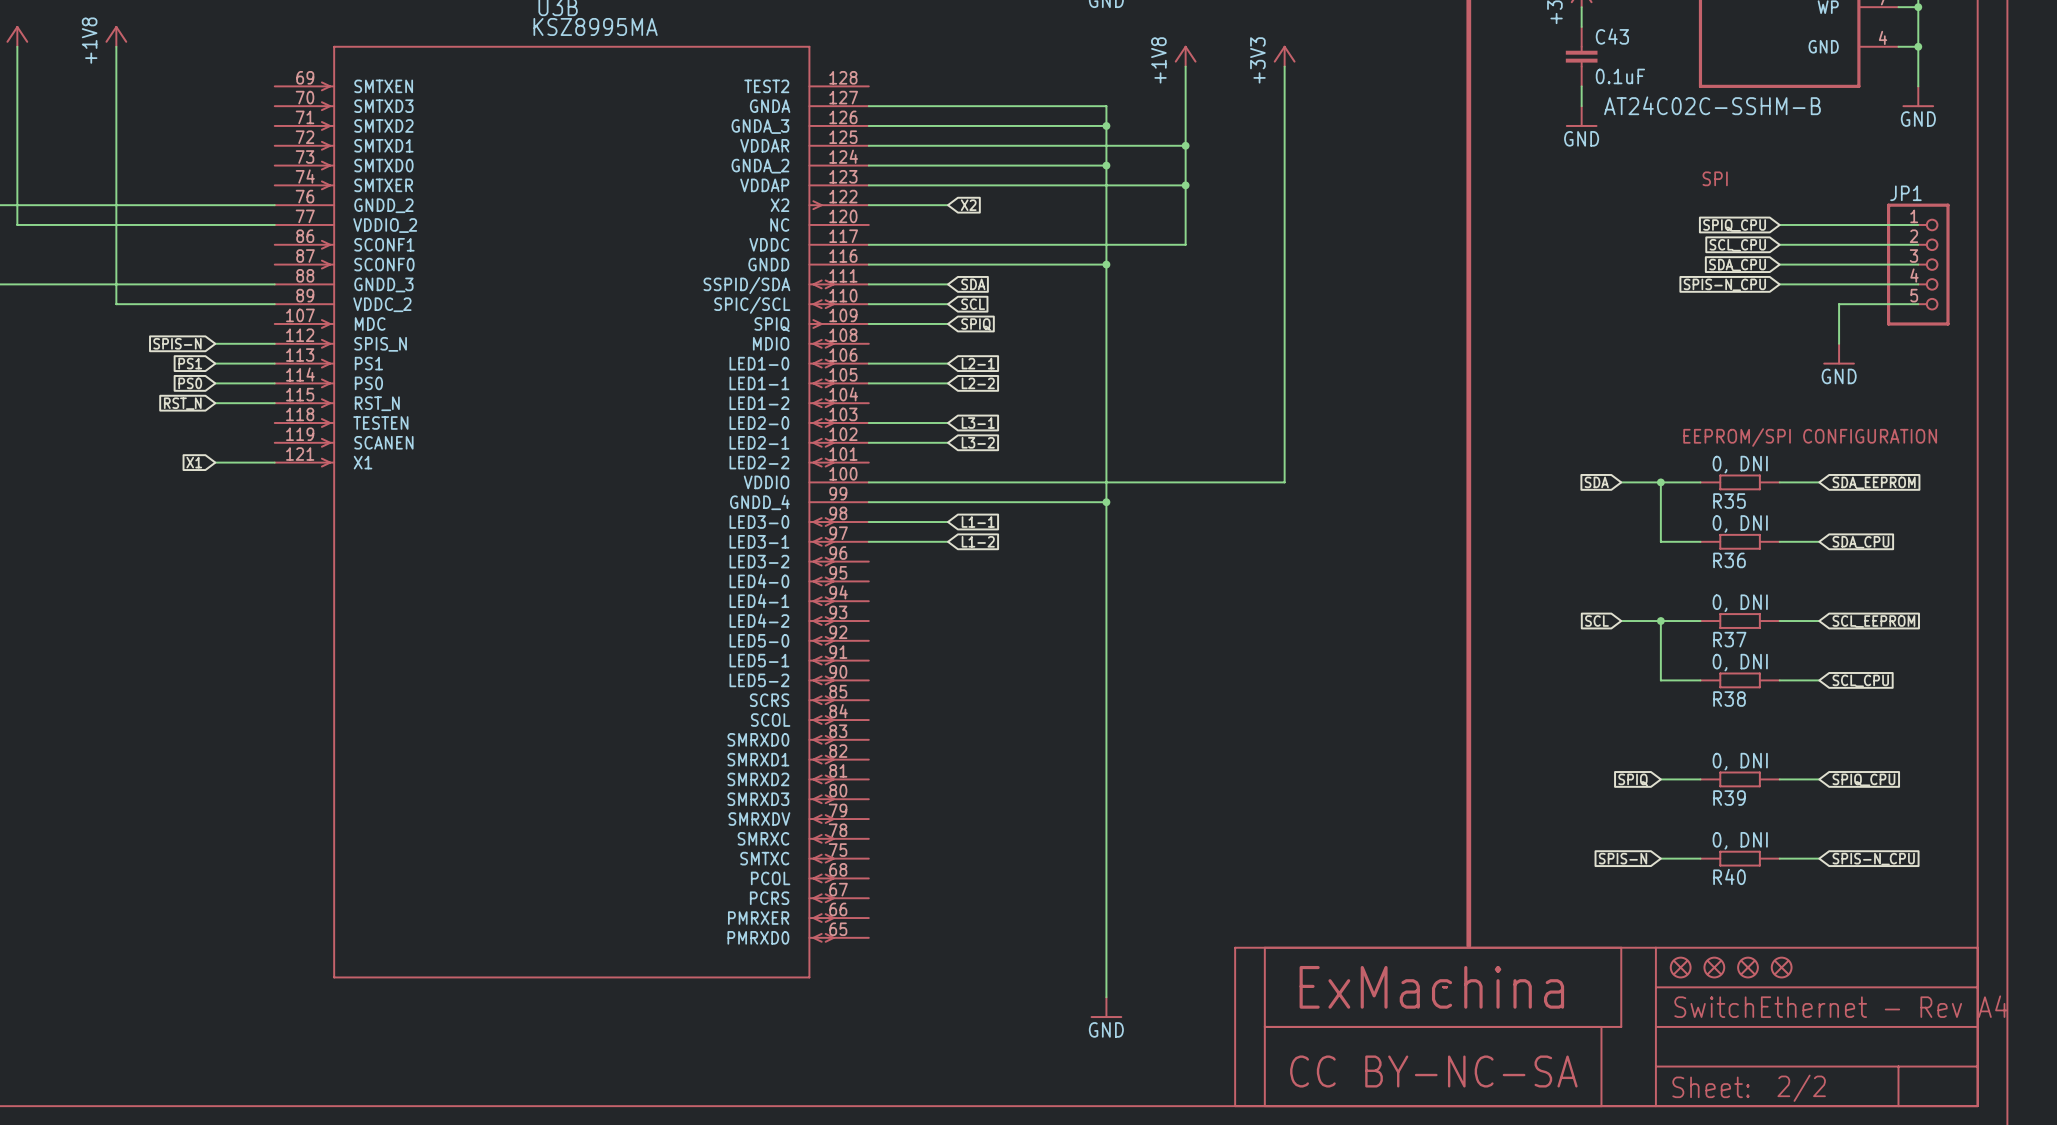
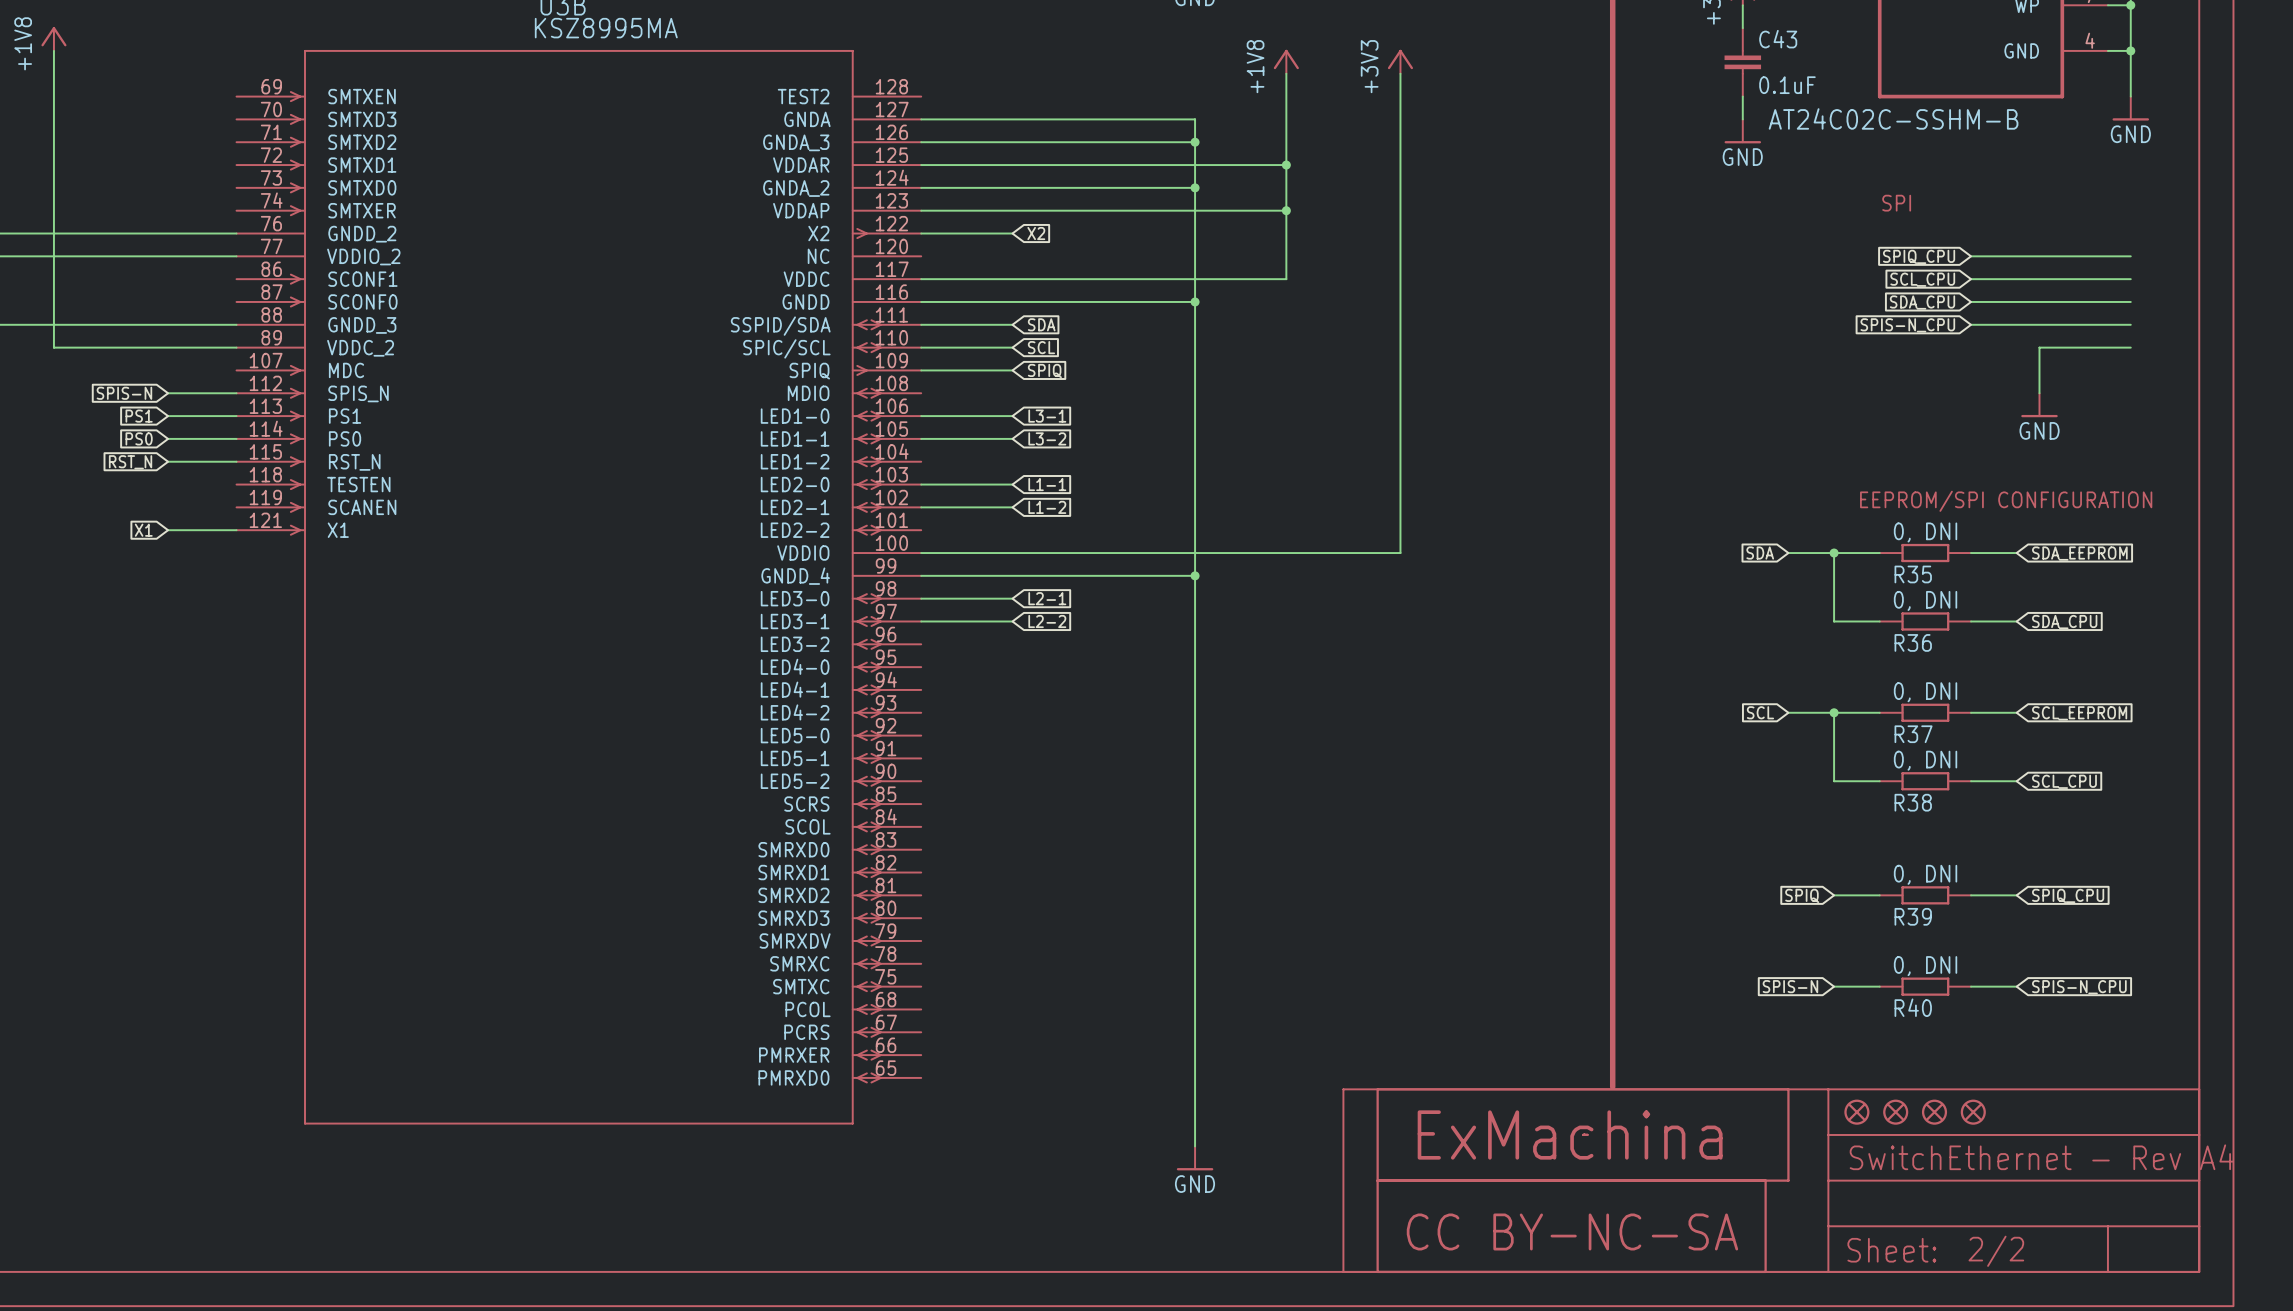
JP1: (1918, 264) -> none
global label: L2-1 (978, 363) -> L3-1 (1047, 416)
global label: L2-2 (978, 383) -> L3-2 (1047, 438)
global label: L3-1 (978, 423) -> L1-1 (1047, 484)
global label: L3-2 (978, 442) -> L1-2 (1047, 507)
global label: L1-1 (978, 522) -> L2-1 (1047, 598)
global label: L1-2 (978, 541) -> L2-2 (1047, 621)

